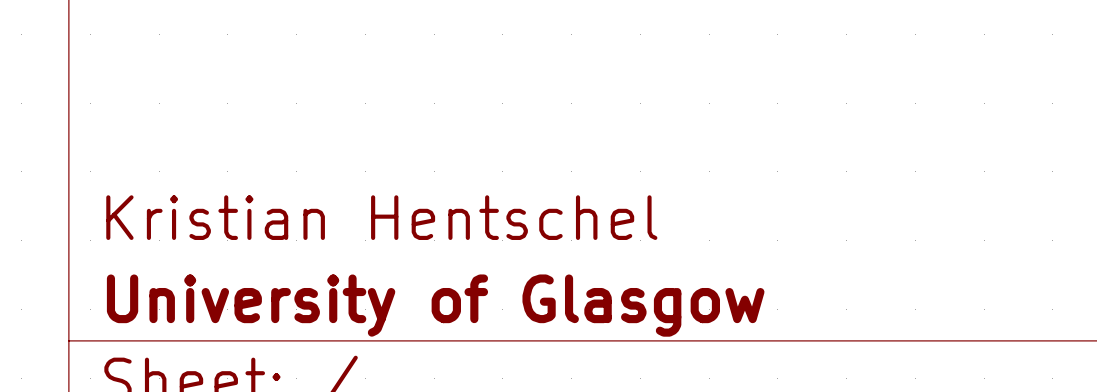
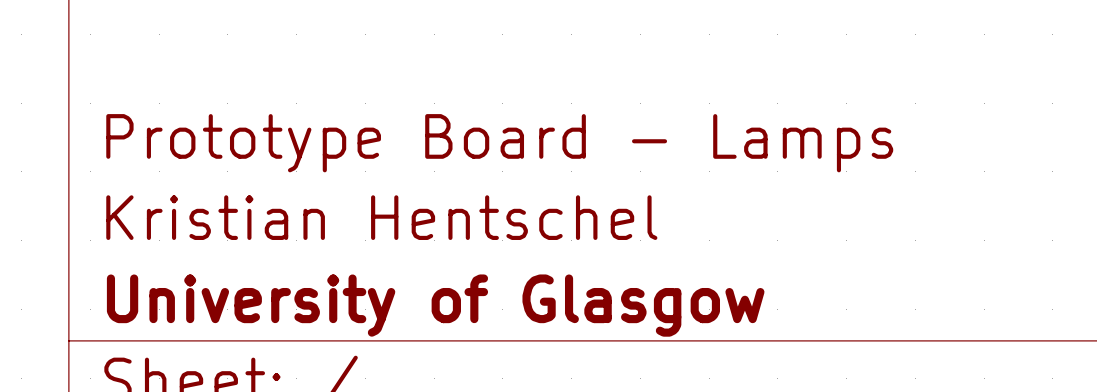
title block: none -> Prototype Board - Lamps (499, 143)

